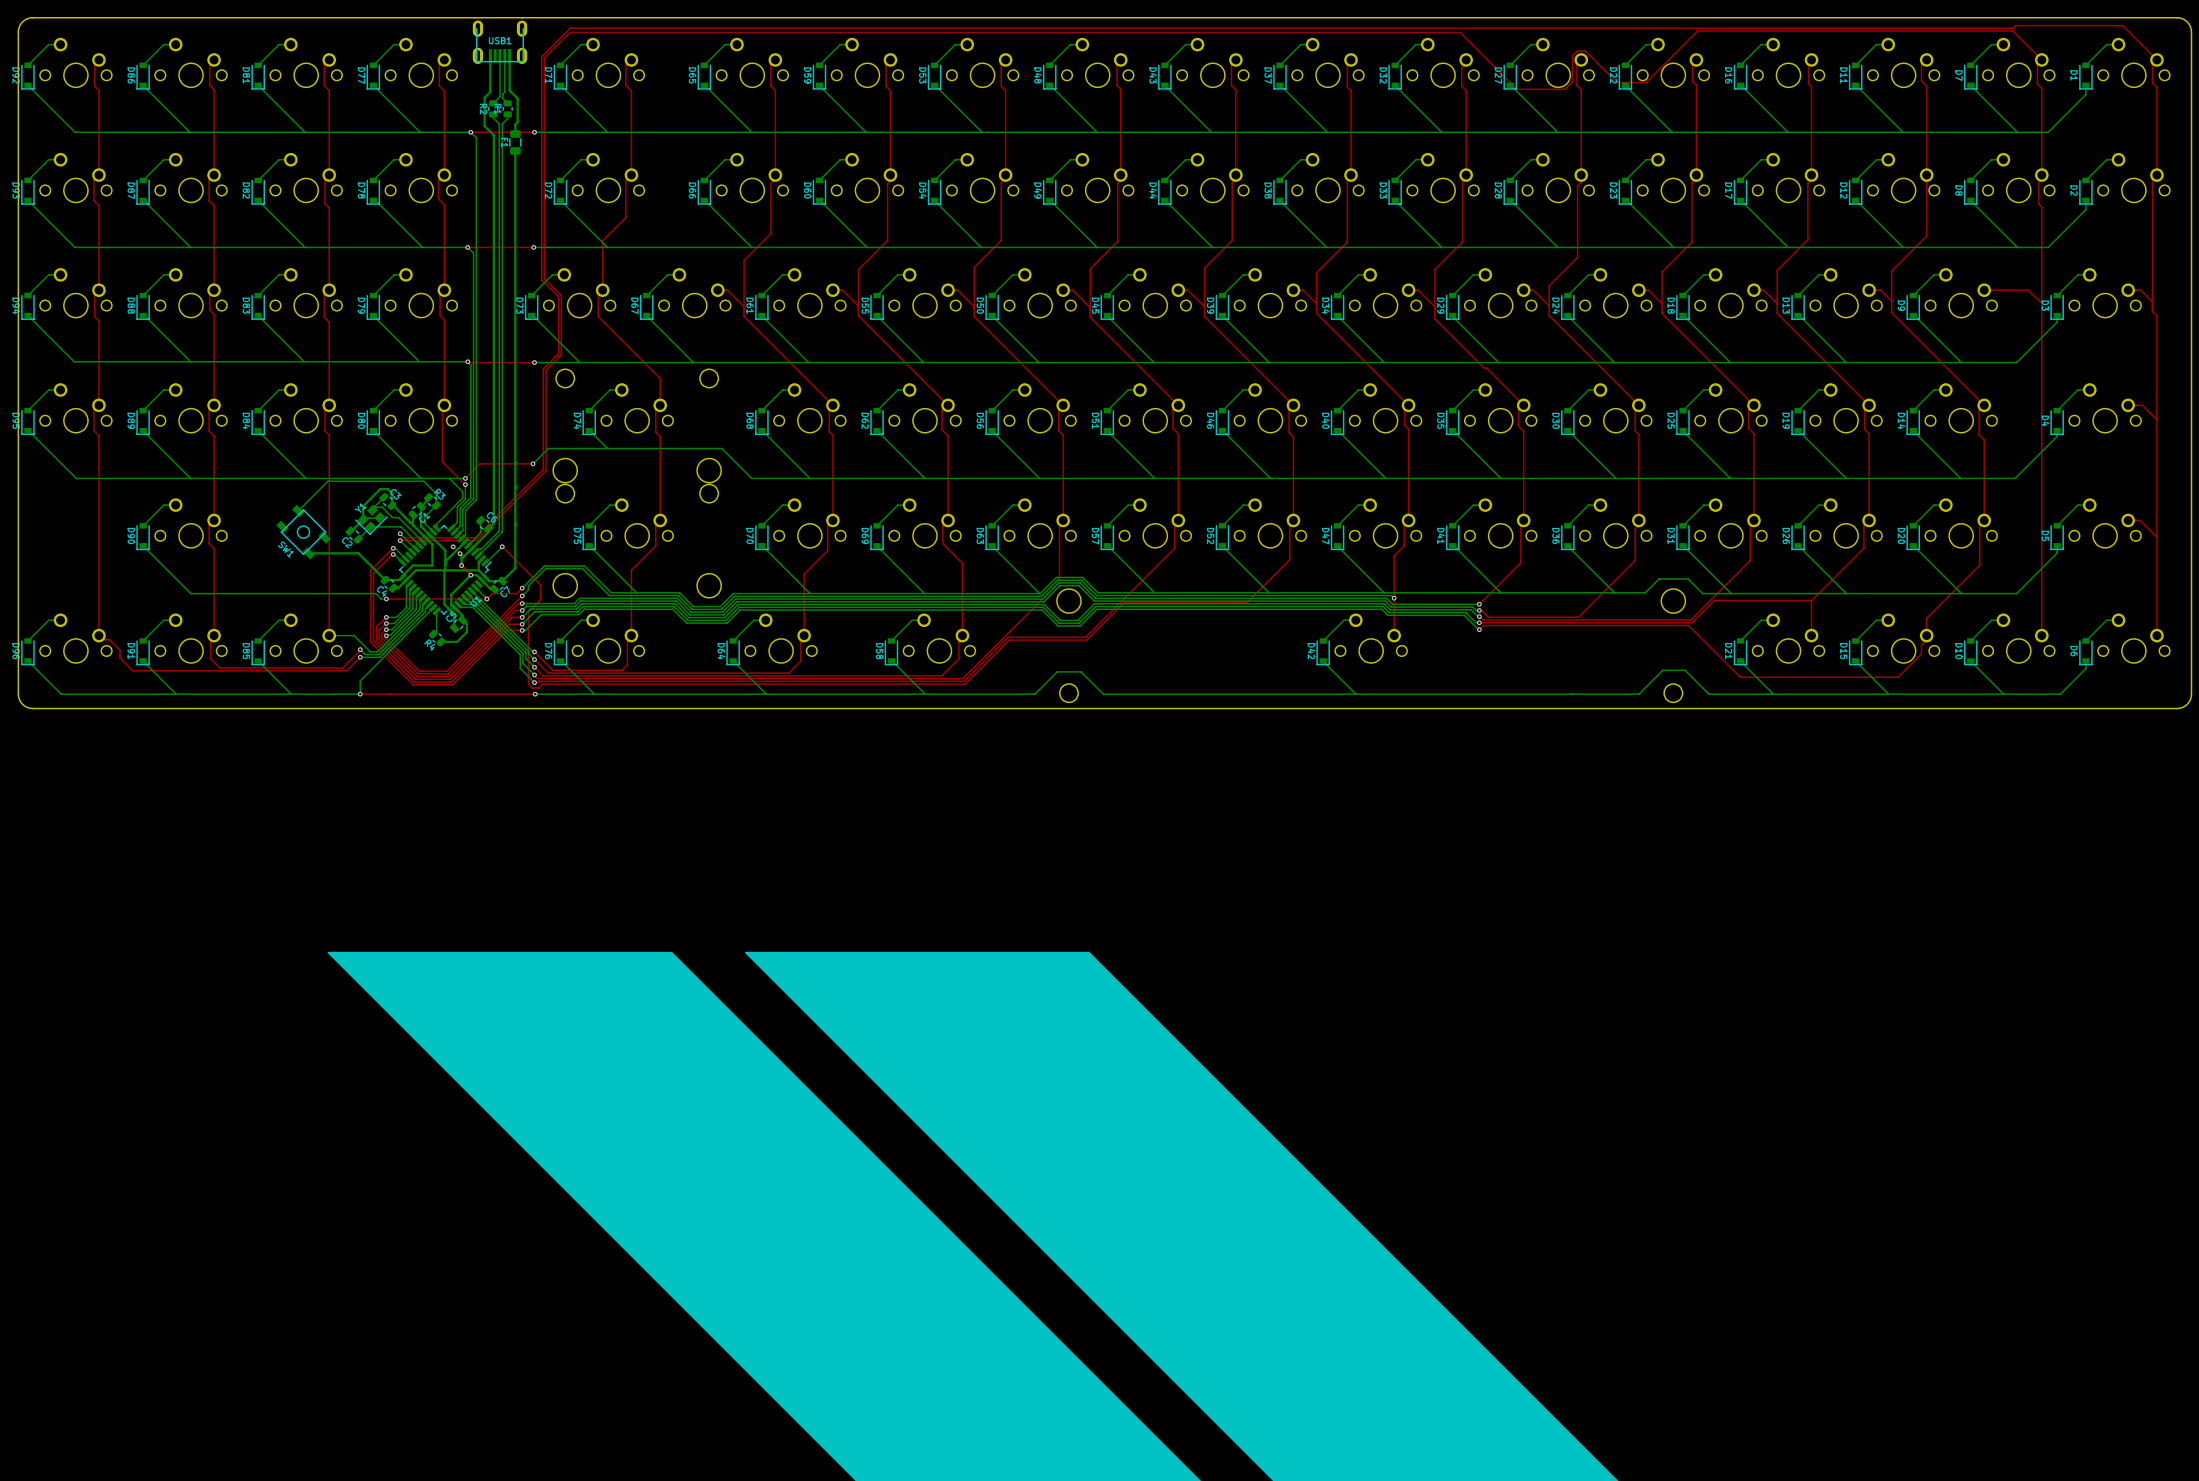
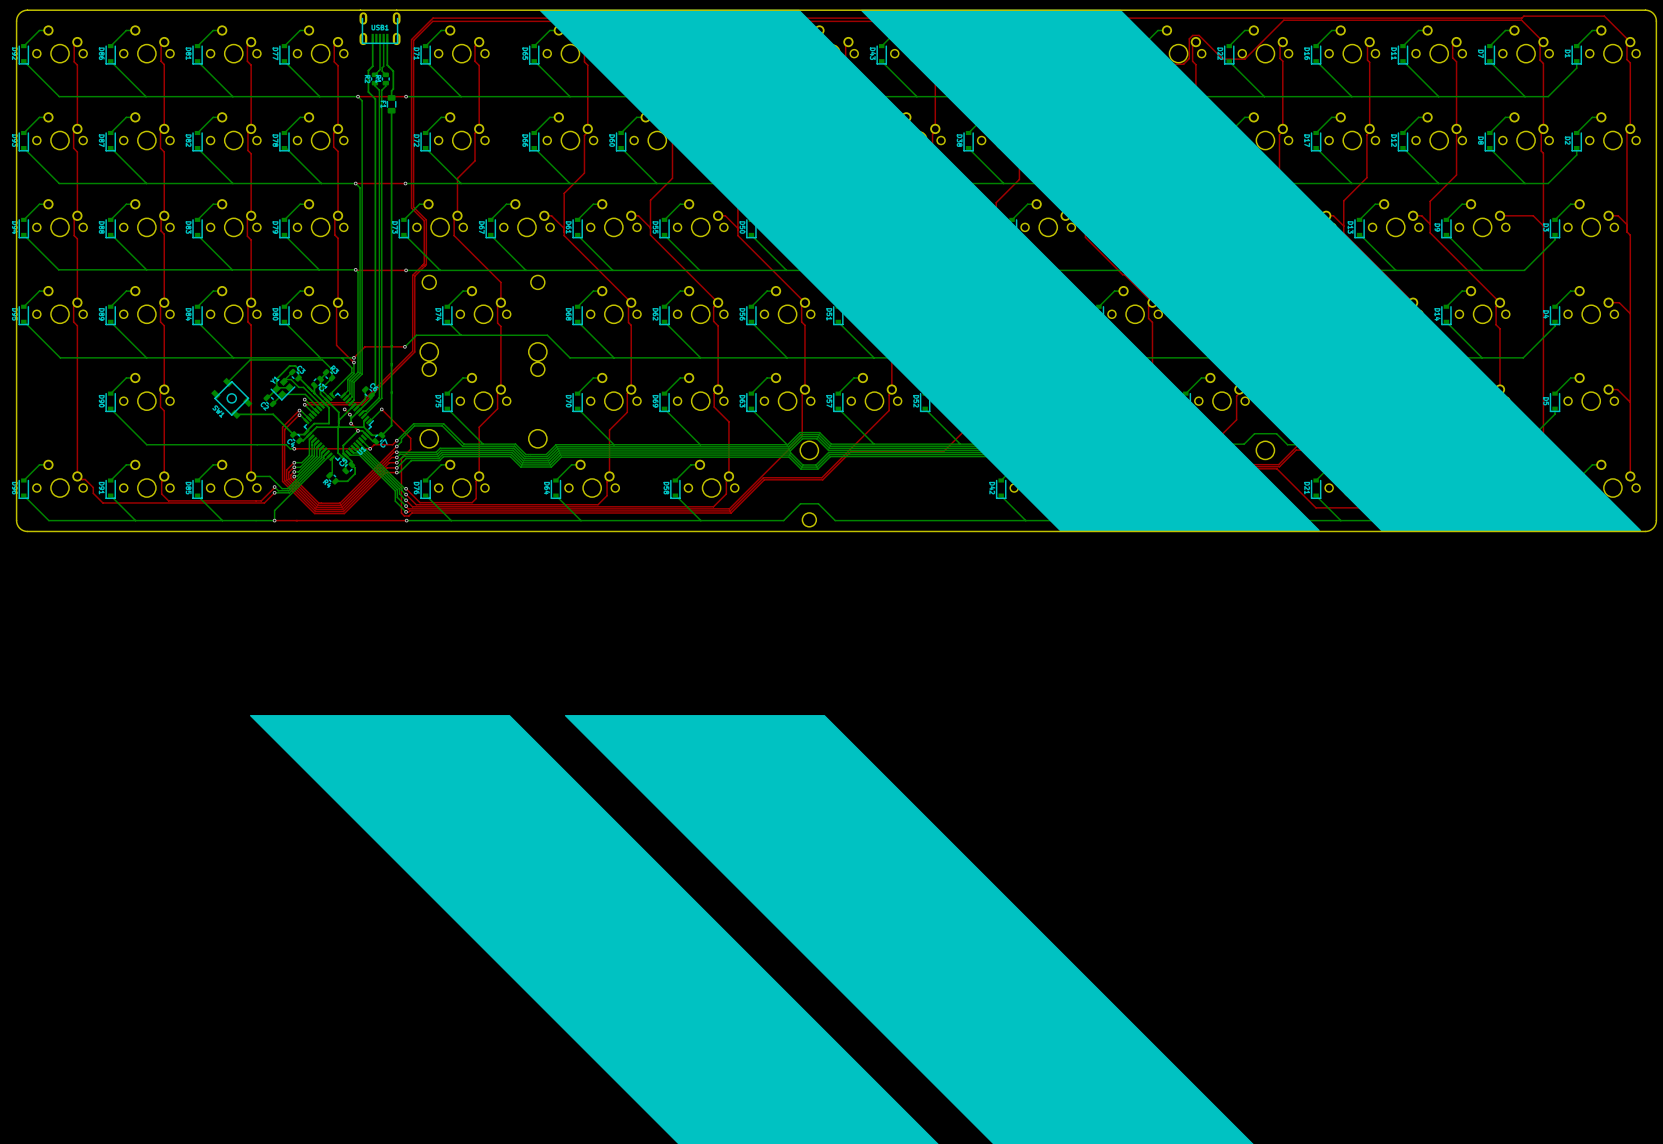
drawing: none -> [539, 9, 1642, 532]

